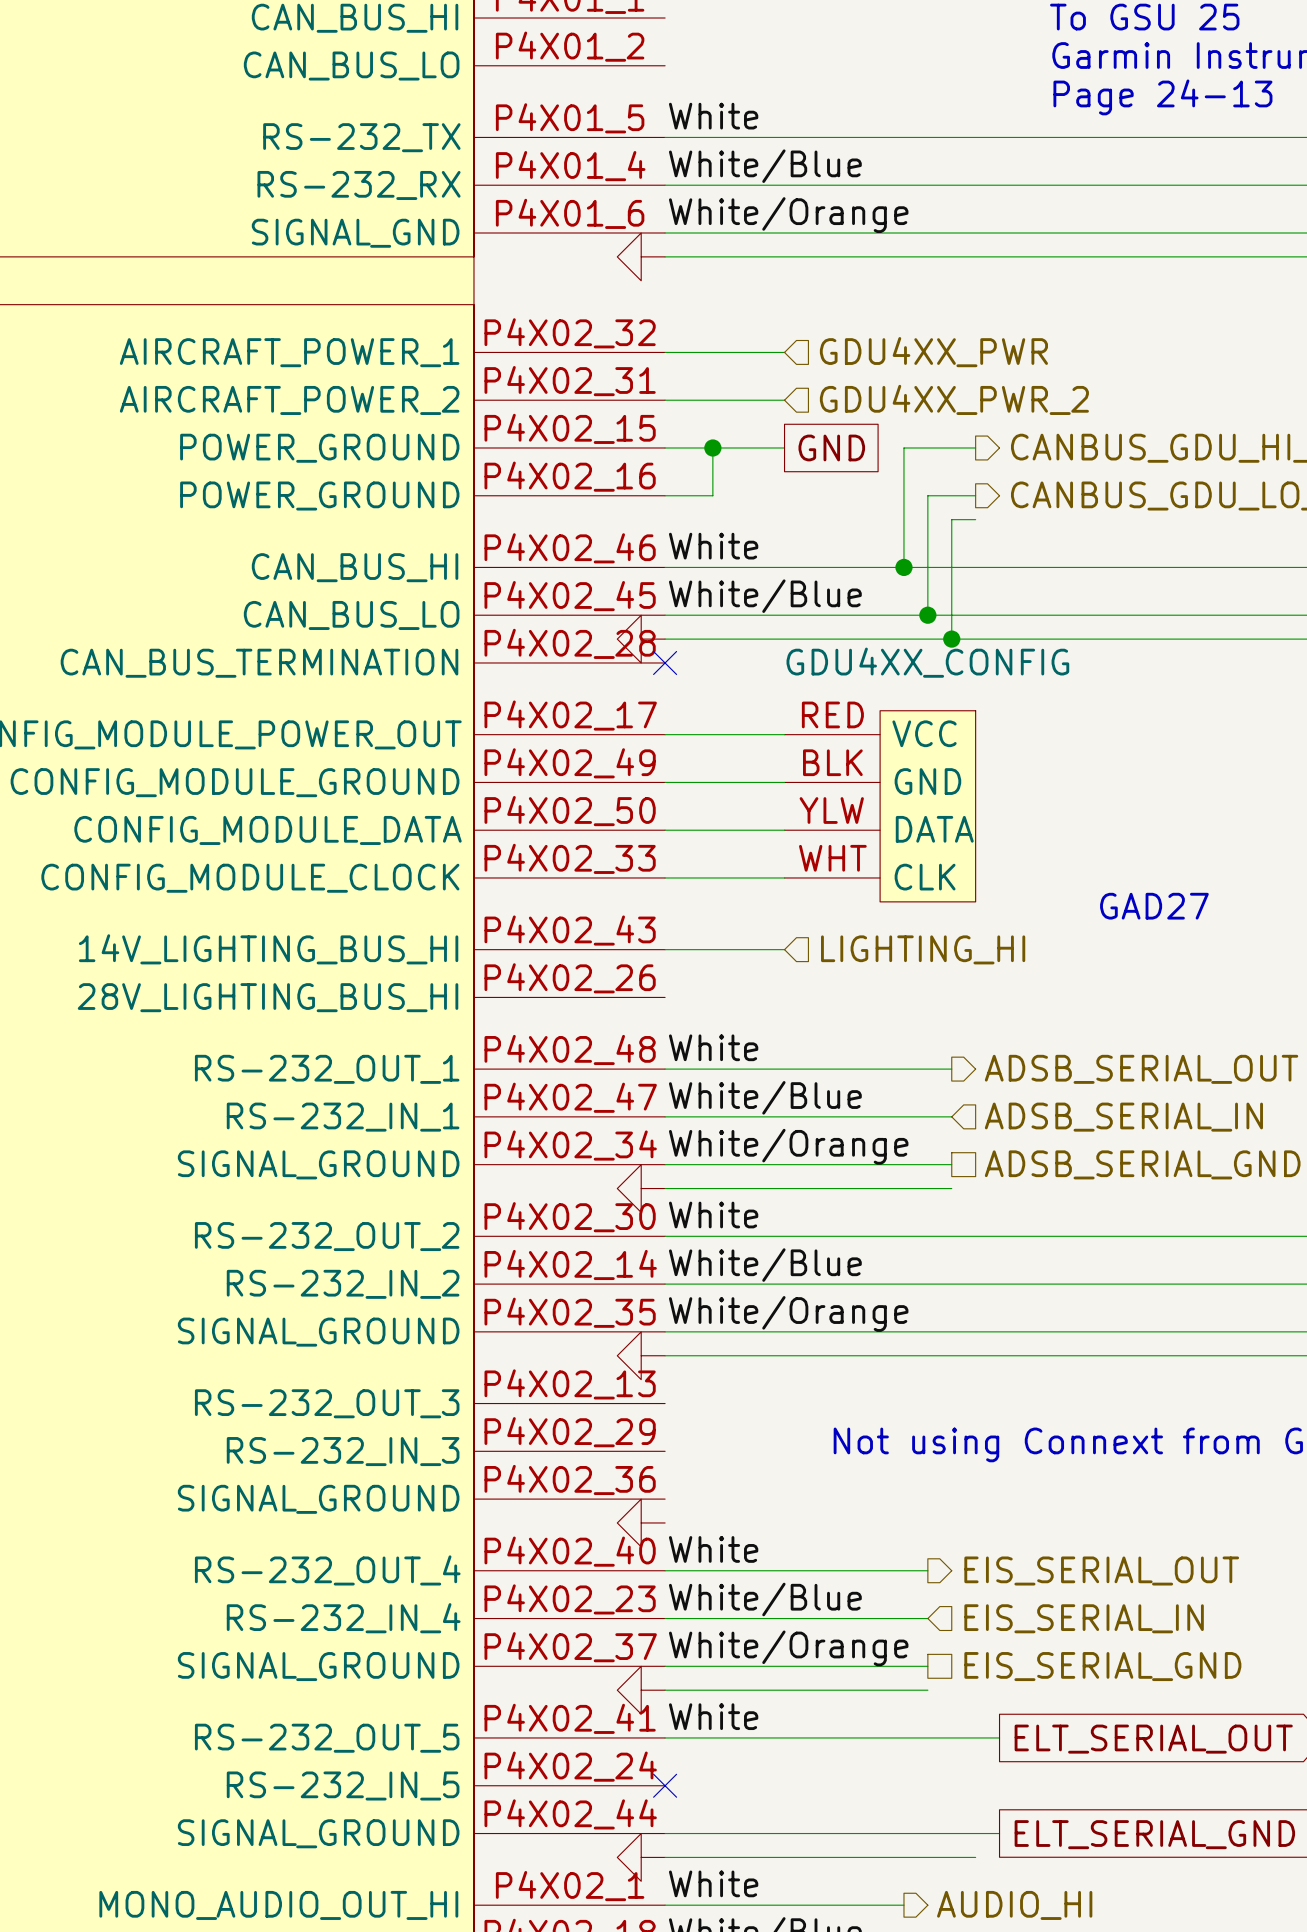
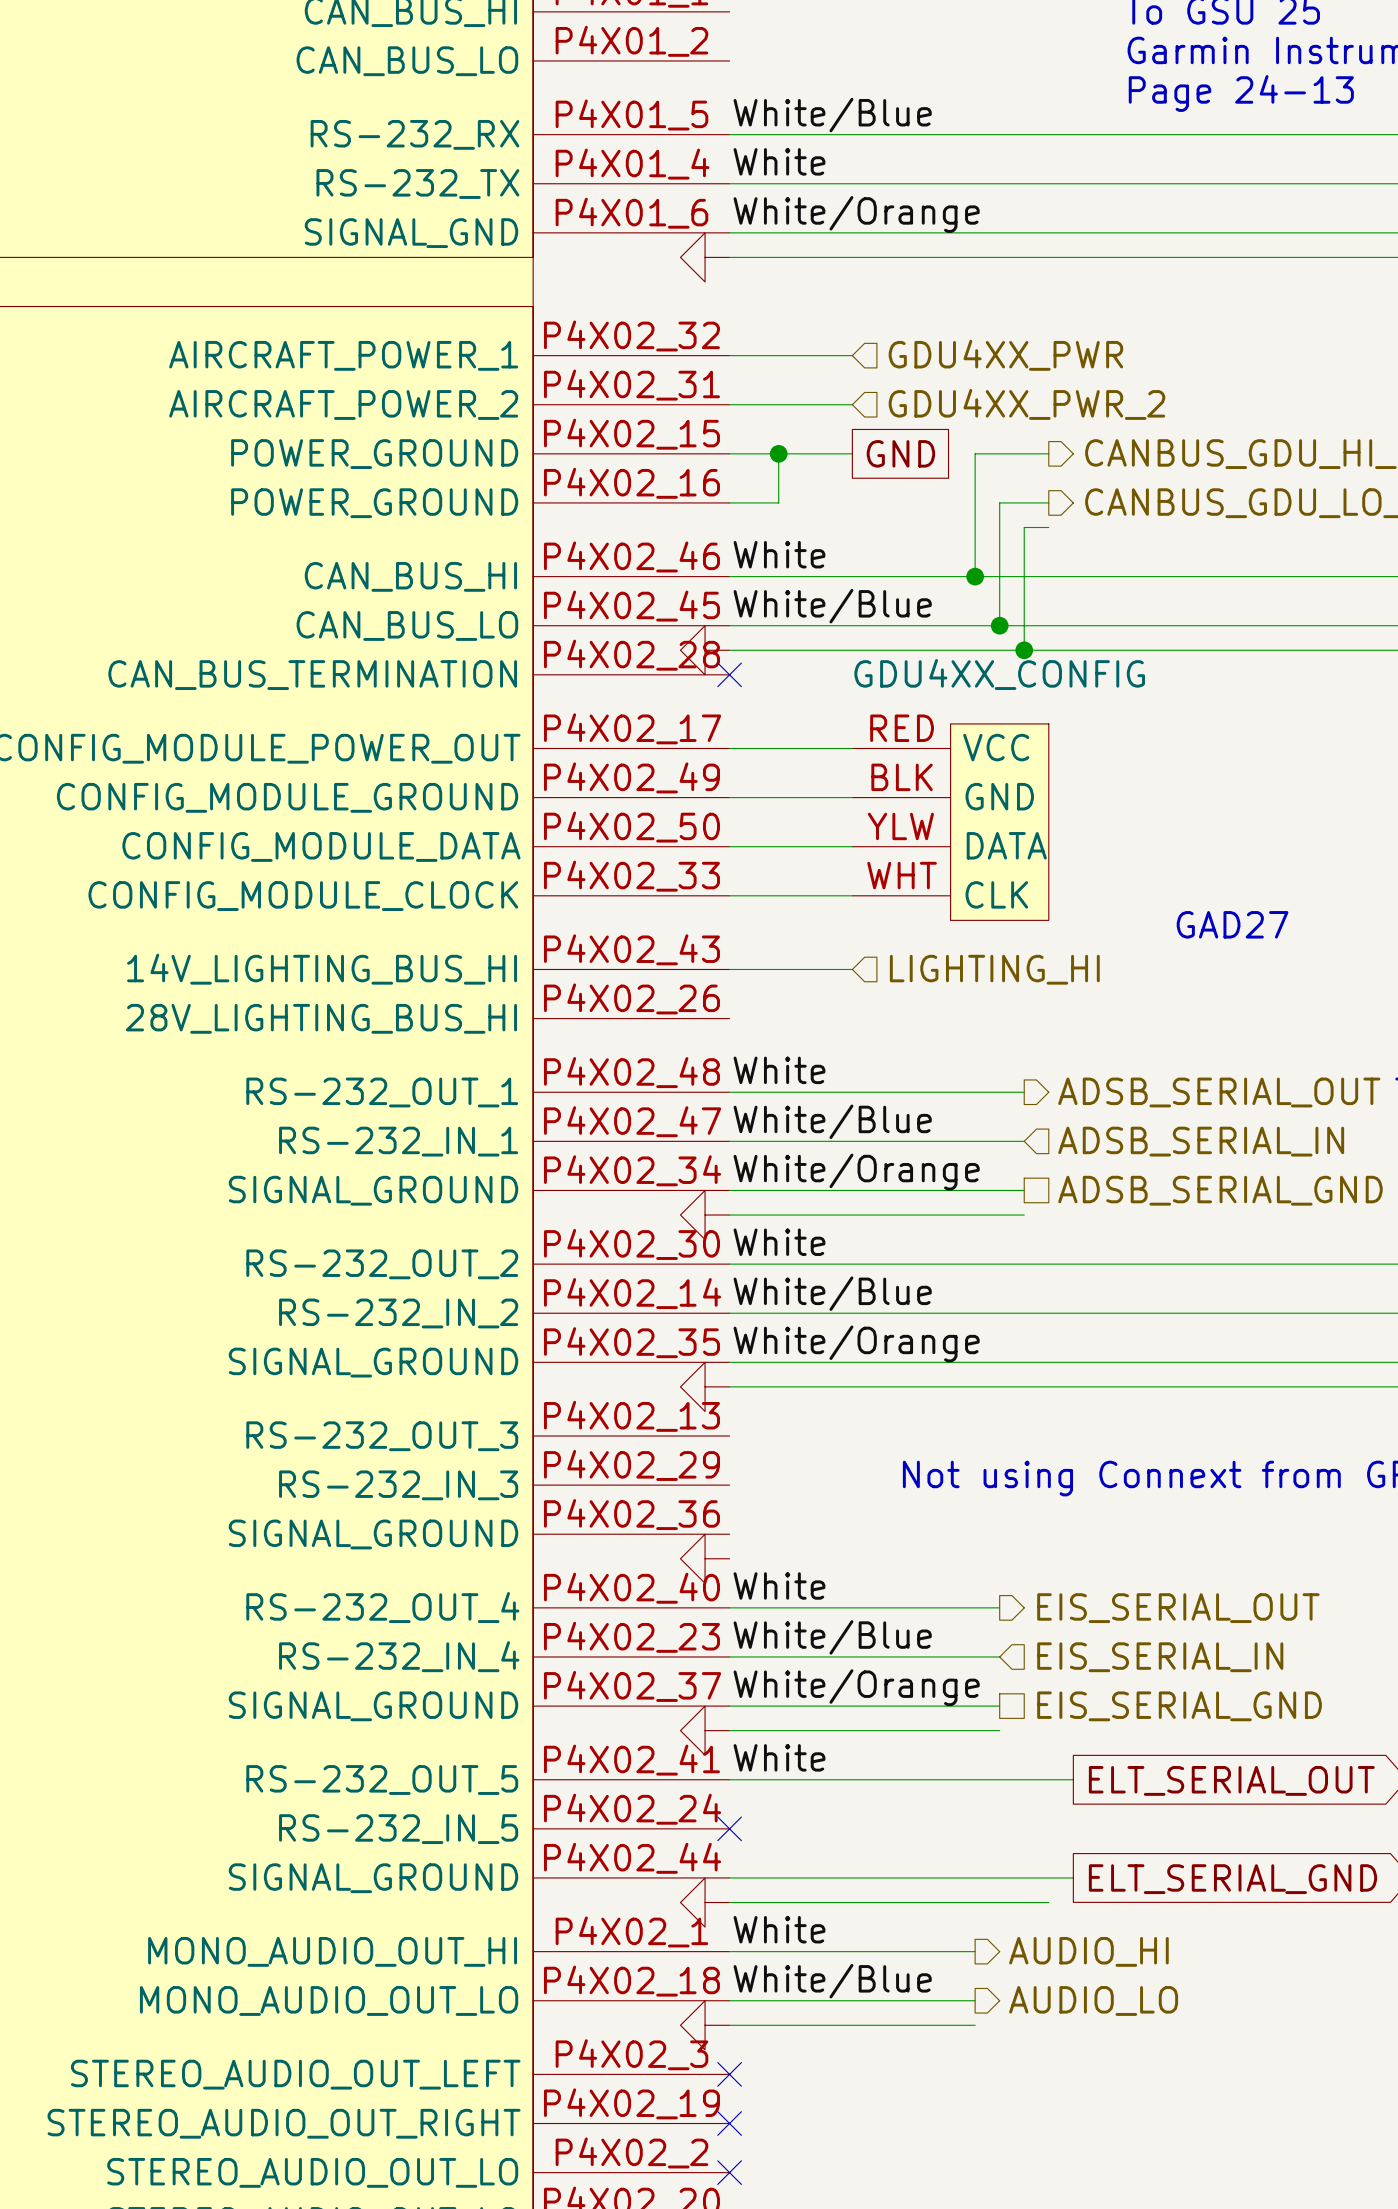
label: White (713, 116) -> White/Blue (832, 115)
part pin name: RS-232_TX (361, 137) -> RS-232_RX (415, 134)
label: White/Blue (765, 166) -> White (779, 161)
part pin name: RS-232_RX (359, 185) -> RS-232_TX (417, 184)

